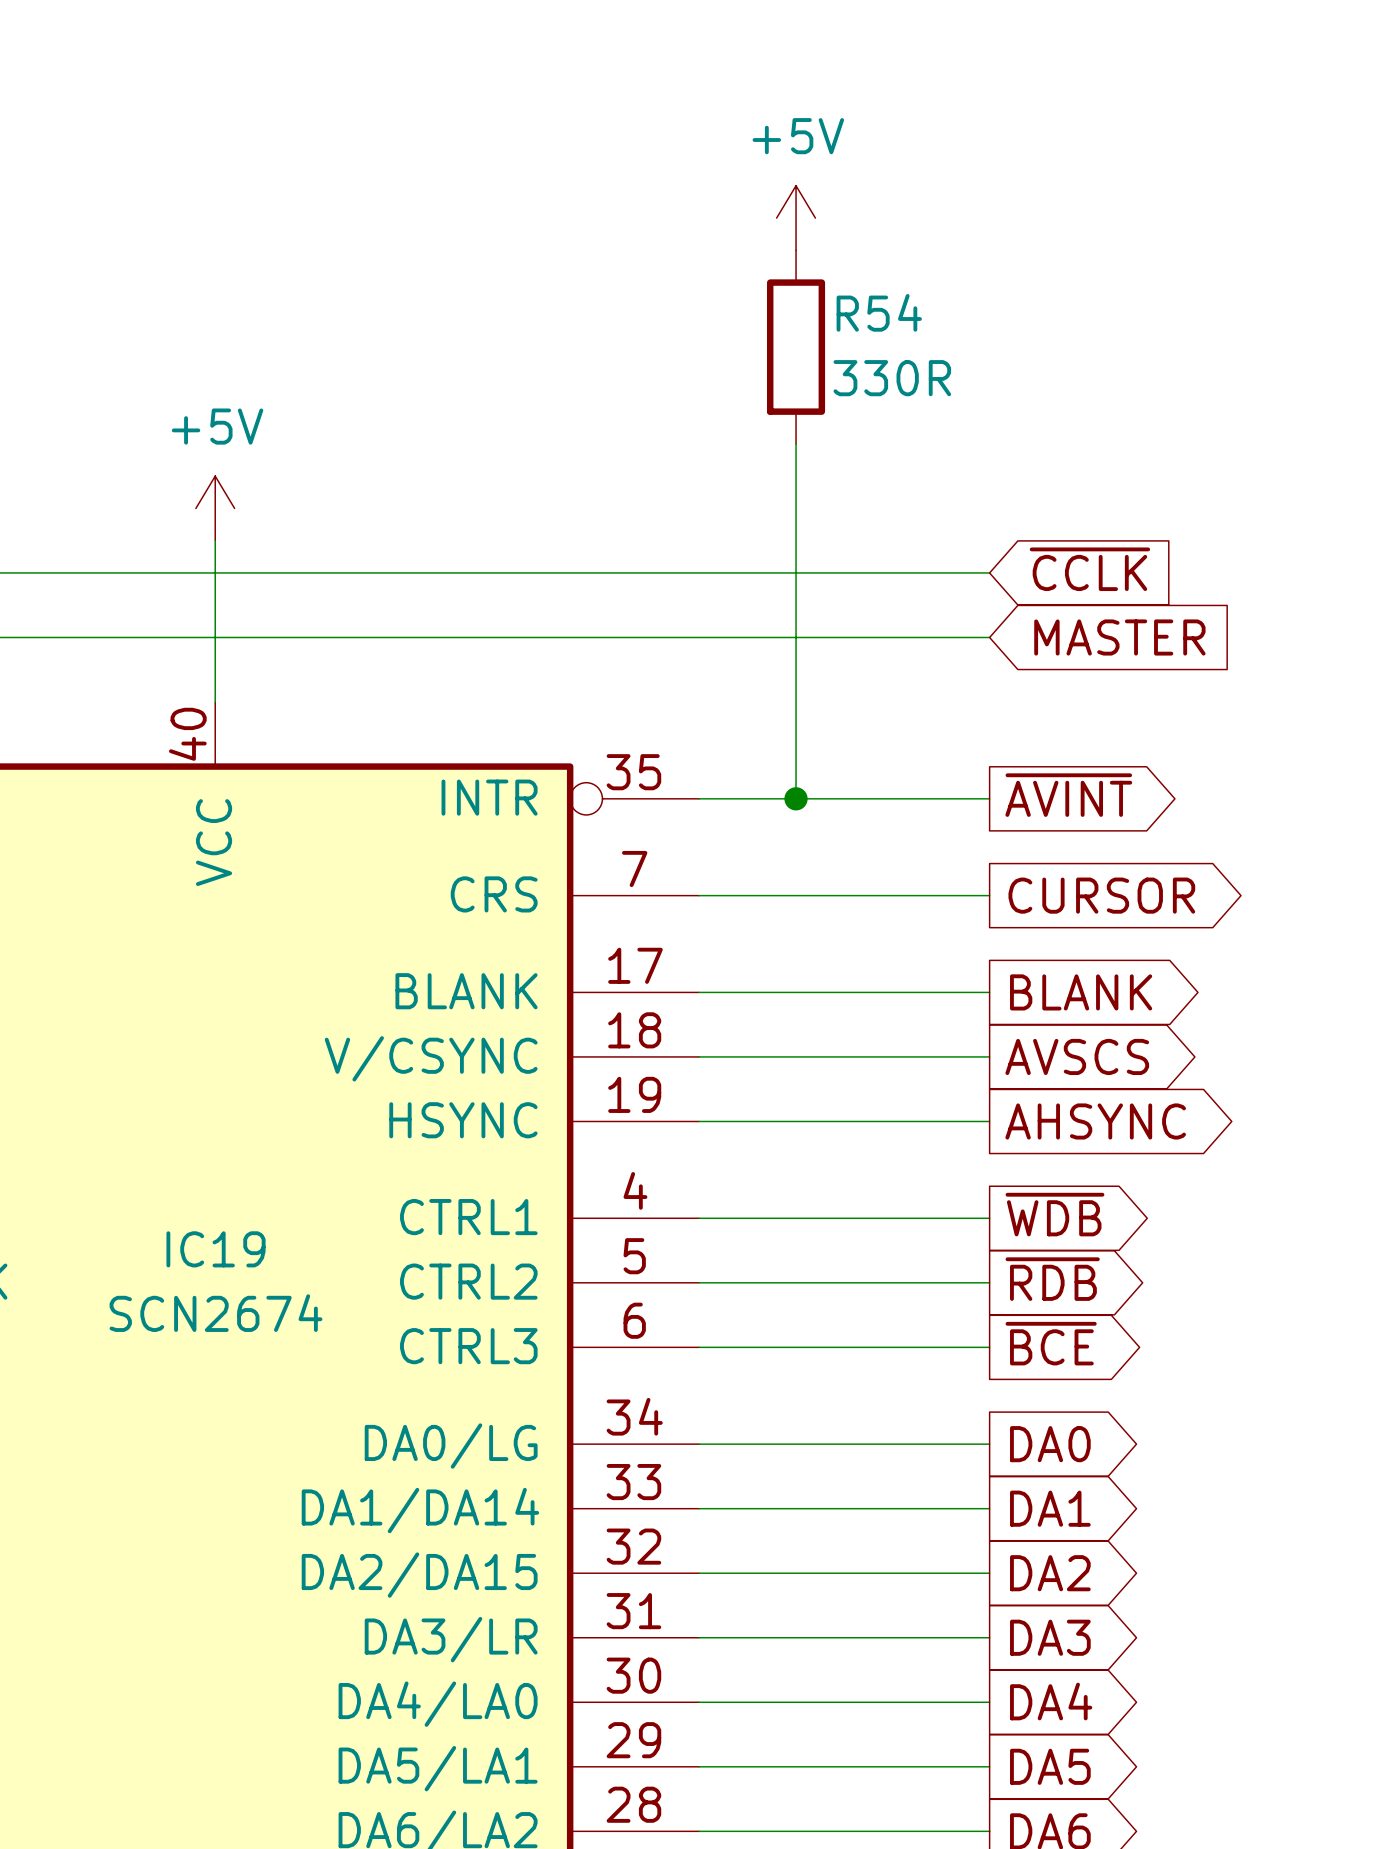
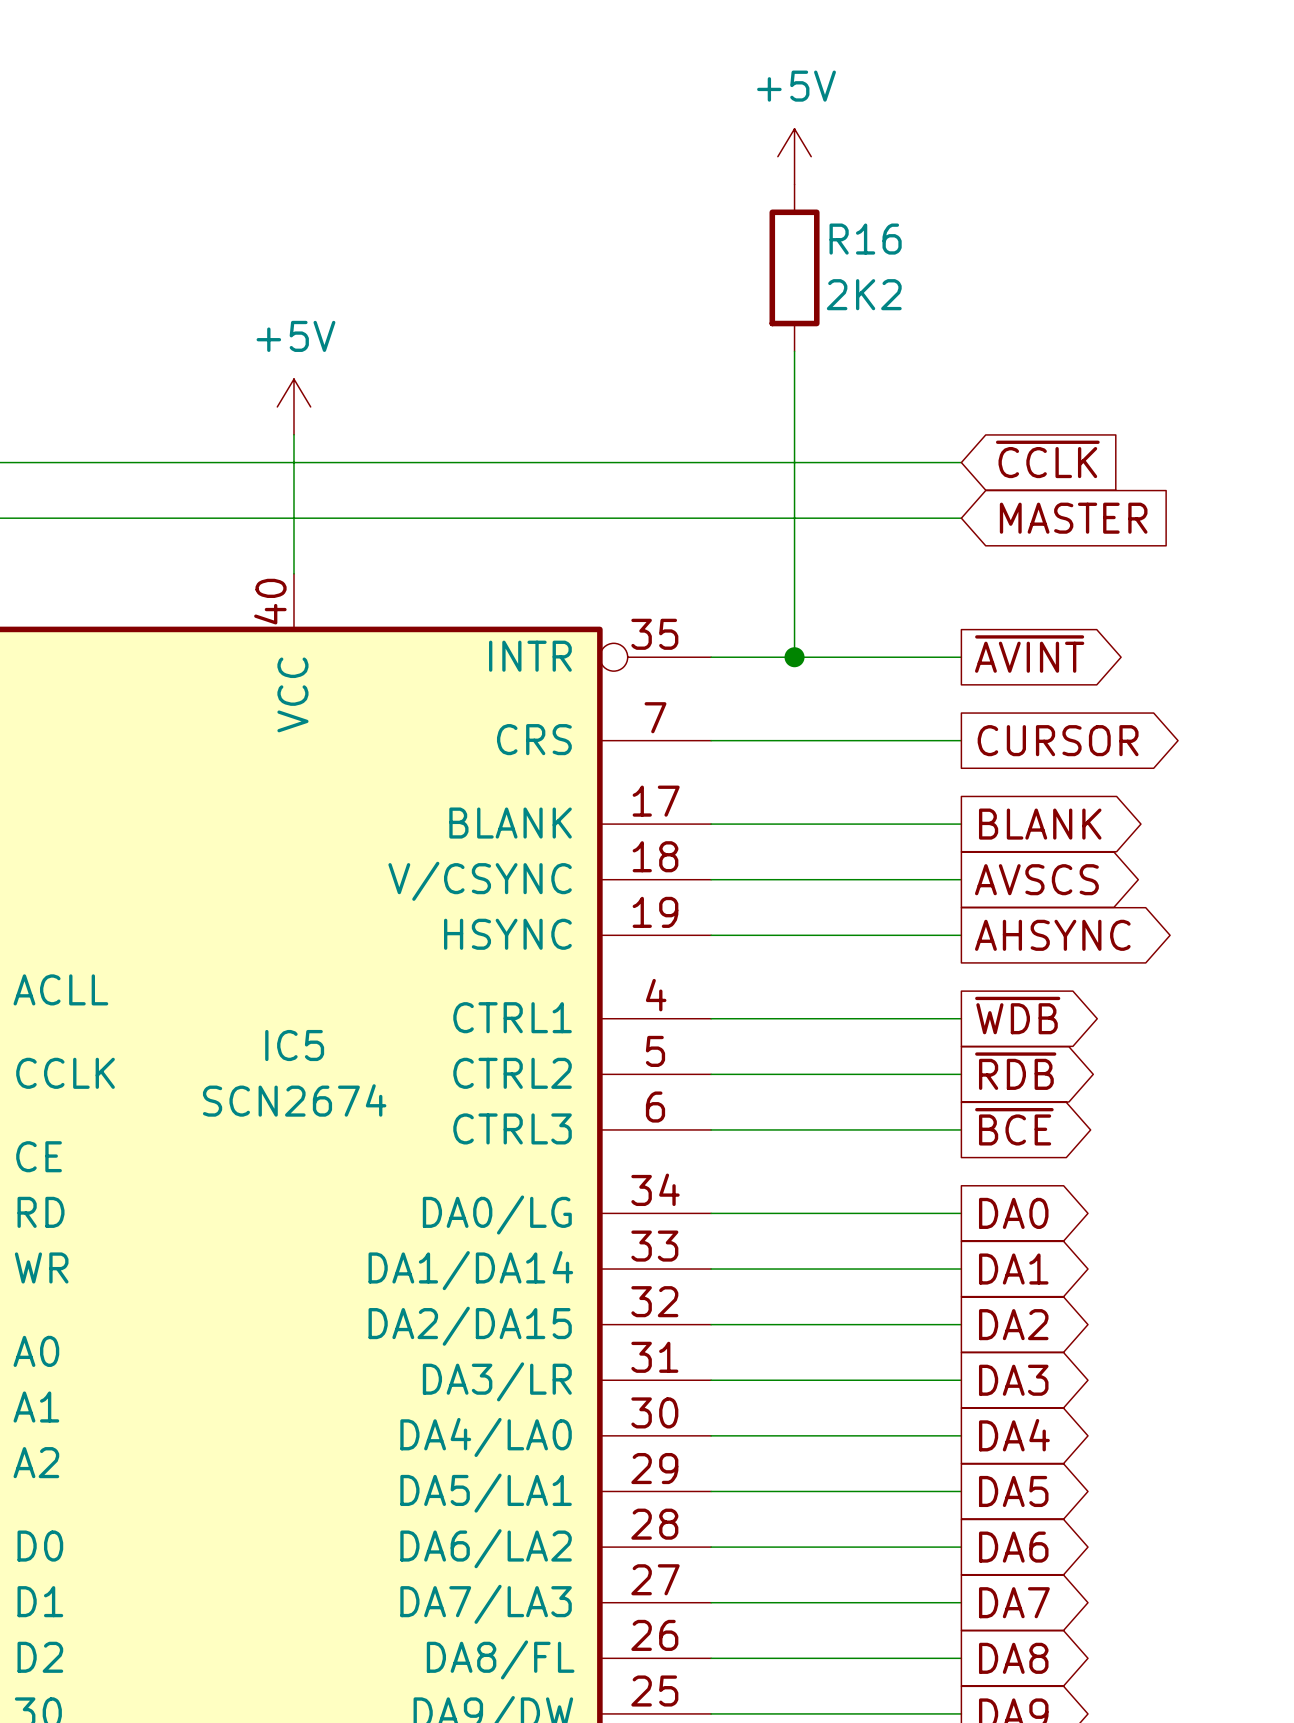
R54 name: R54 (879, 312) -> R16 (865, 239)
R54 value: 330R (892, 378) -> 2K2 (864, 294)
IC19 name: IC19 (216, 1249) -> IC5 (294, 1045)

